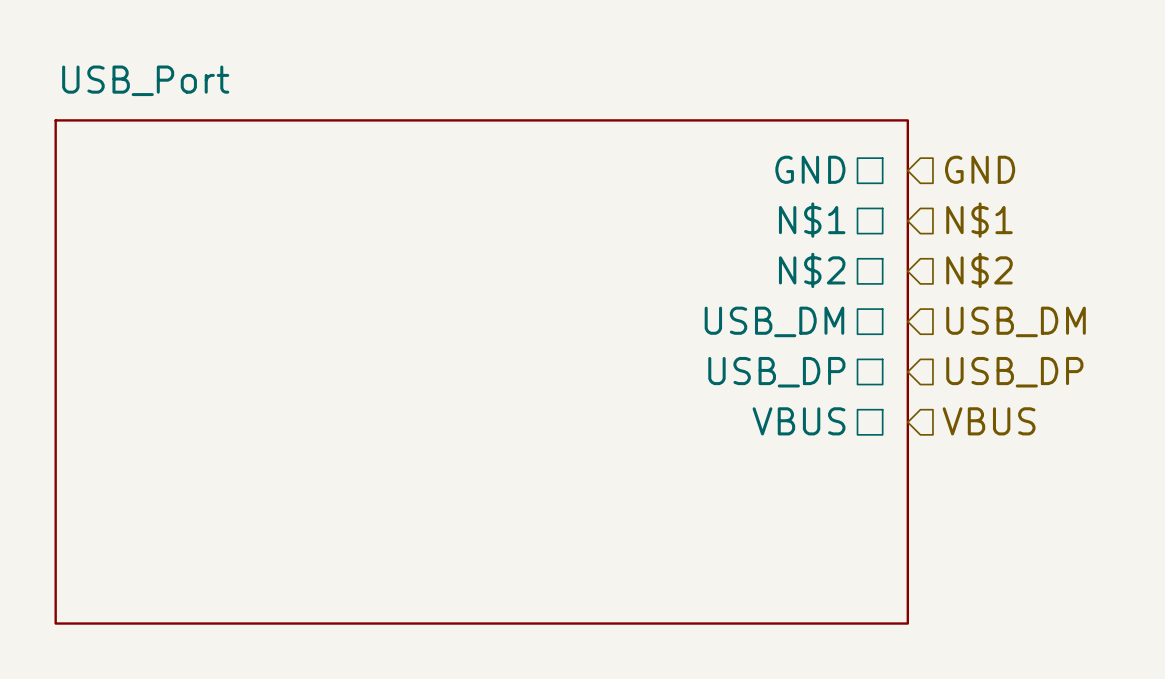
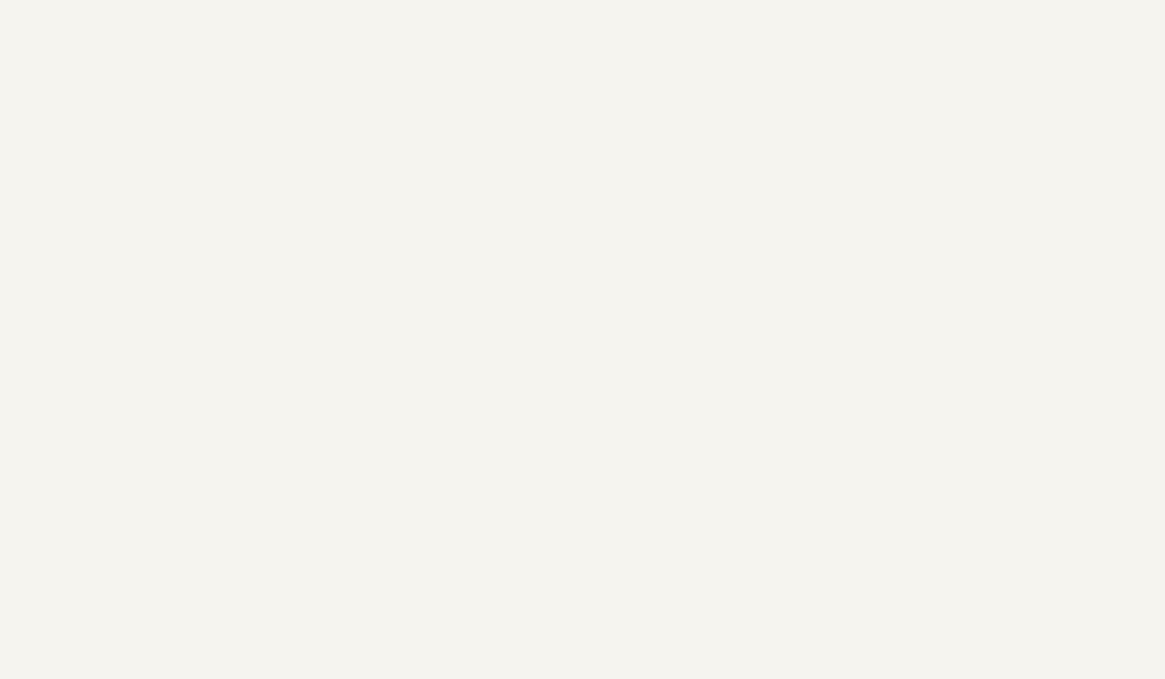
sheet pin: GND (810, 169) -> none
hierarchical label: GND (980, 169) -> none
sheet pin: N$1 (812, 220) -> none
hierarchical label: N$1 (979, 220) -> none
sheet pin: N$2 (812, 270) -> none
hierarchical label: N$2 (979, 270) -> none
sheet pin: USB_DM (774, 321) -> none
hierarchical label: USB_DM (1016, 321) -> none
sheet USB_Port: (481, 371) -> none
sheet pin: USB_DP (776, 372) -> none
hierarchical label: USB_DP (1014, 372) -> none
sheet pin: VBUS (799, 421) -> none
hierarchical label: VBUS (989, 421) -> none

